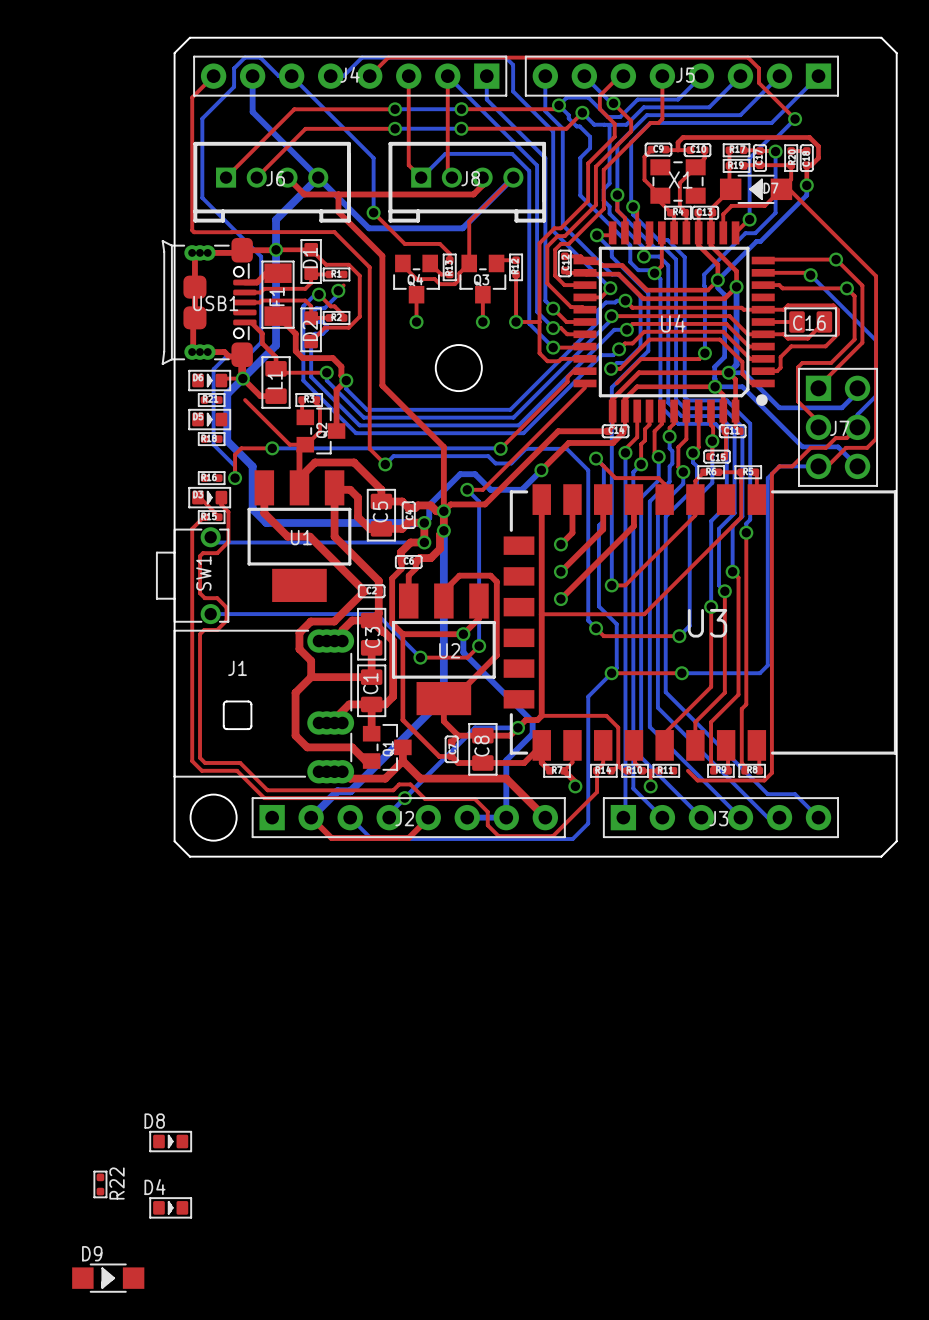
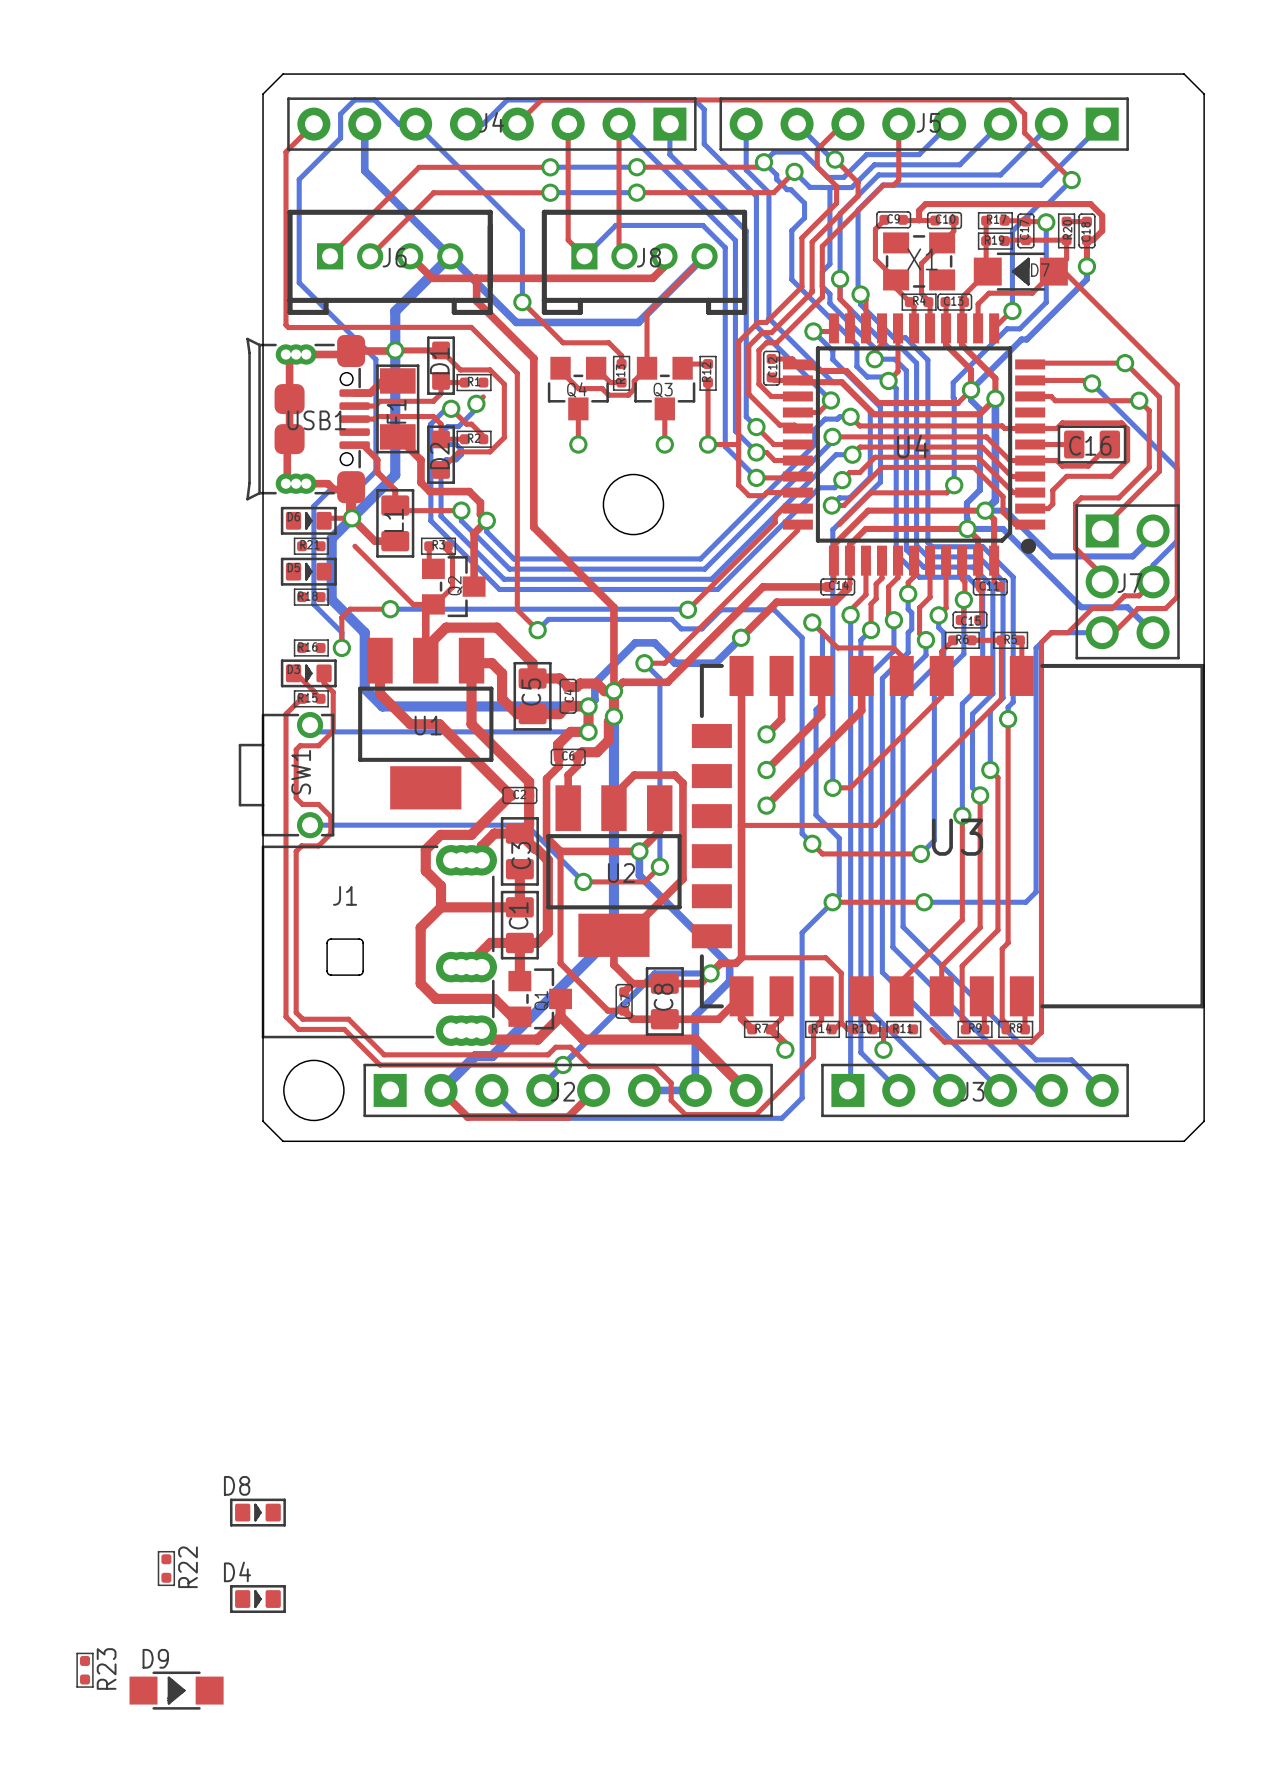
R23: none -> (85, 1670)

